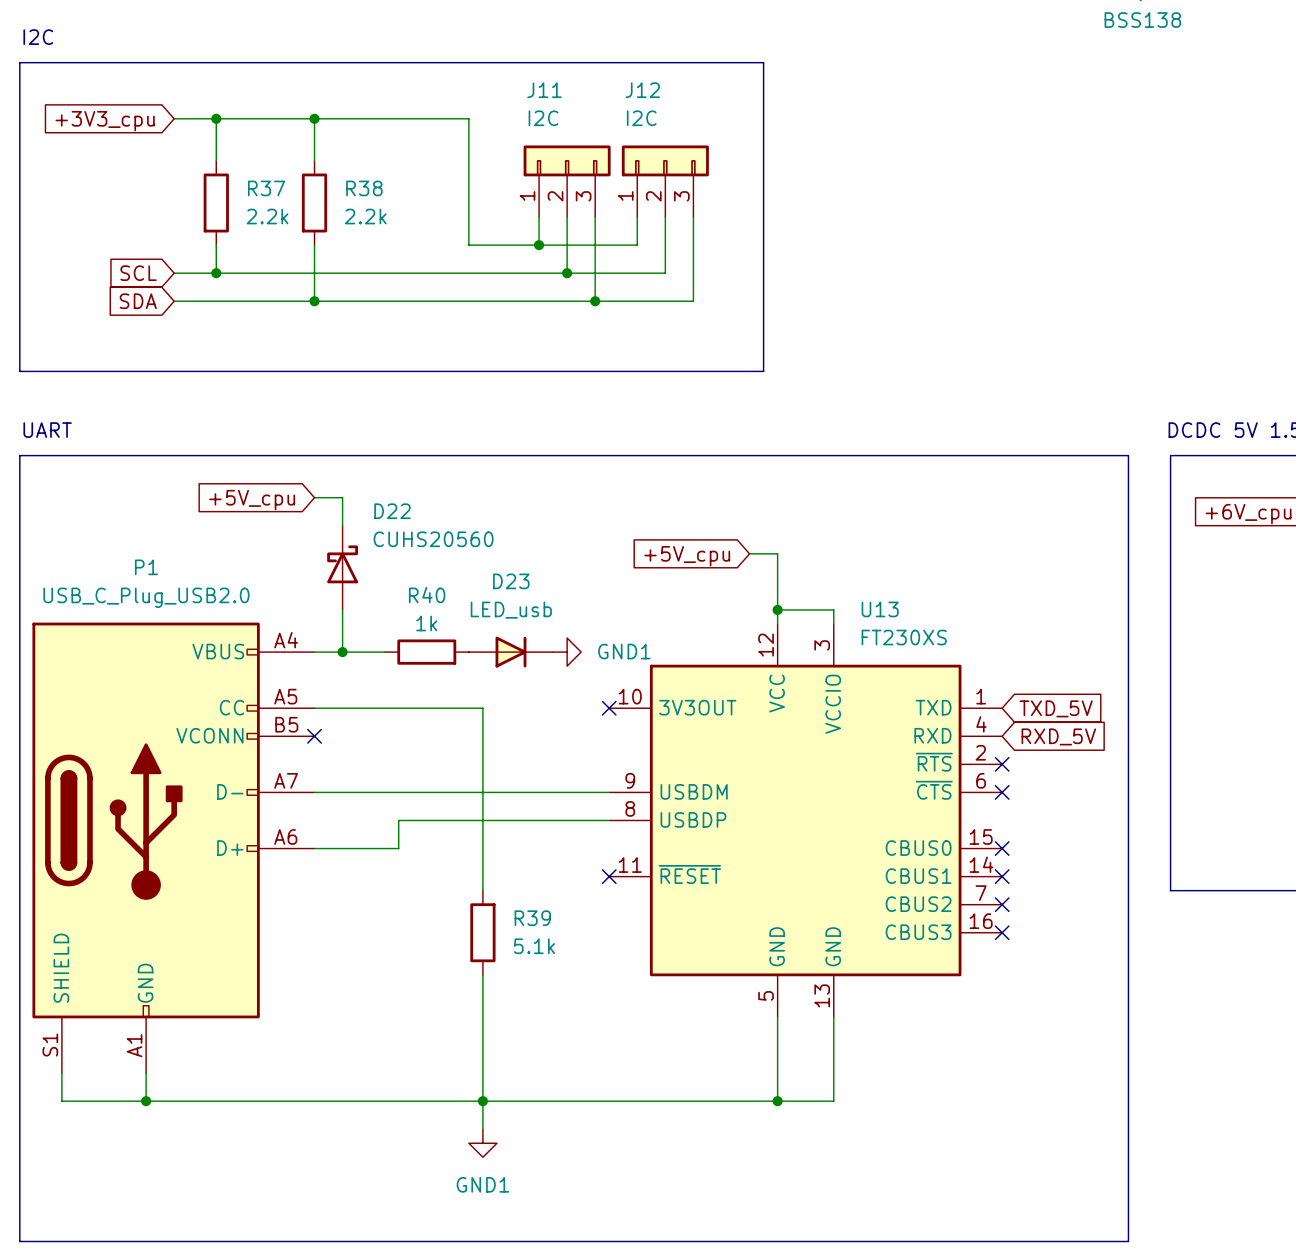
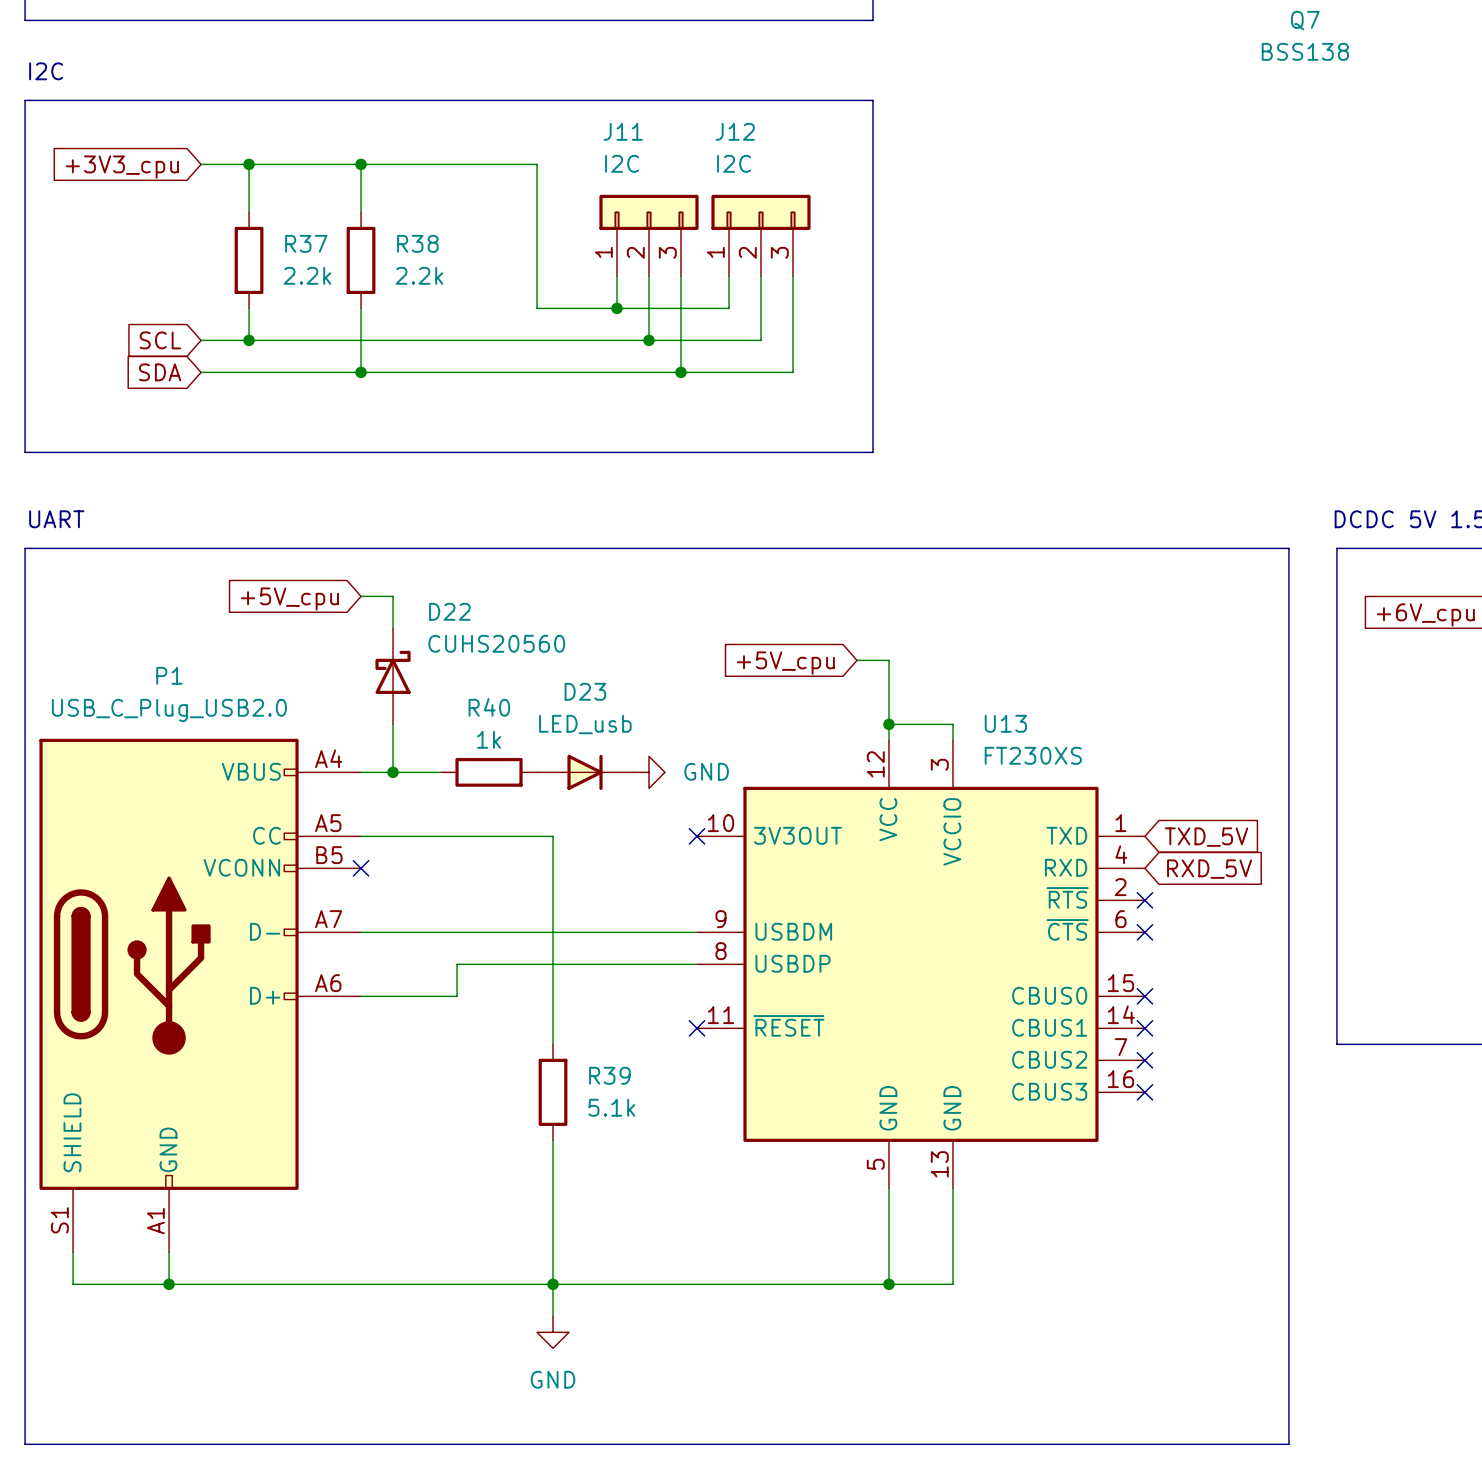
power symbol: GND1 (567, 652) -> GND (649, 772)
power symbol: GND1 (482, 1143) -> GND (553, 1332)

